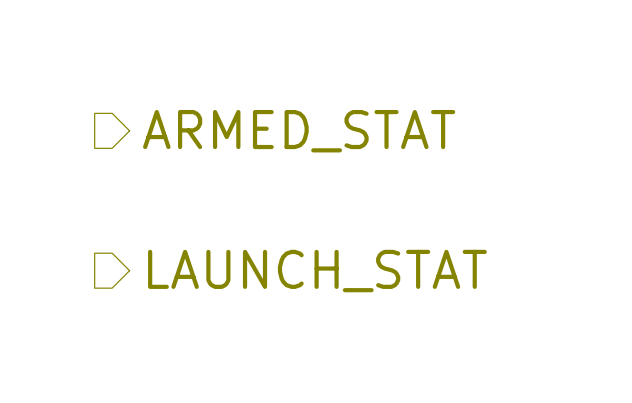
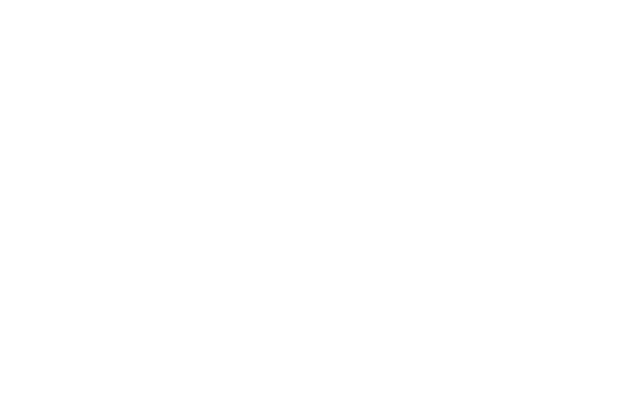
hierarchical label: ARMED_STAT (299, 131) -> none
hierarchical label: LAUNCH_STAT (317, 271) -> none

